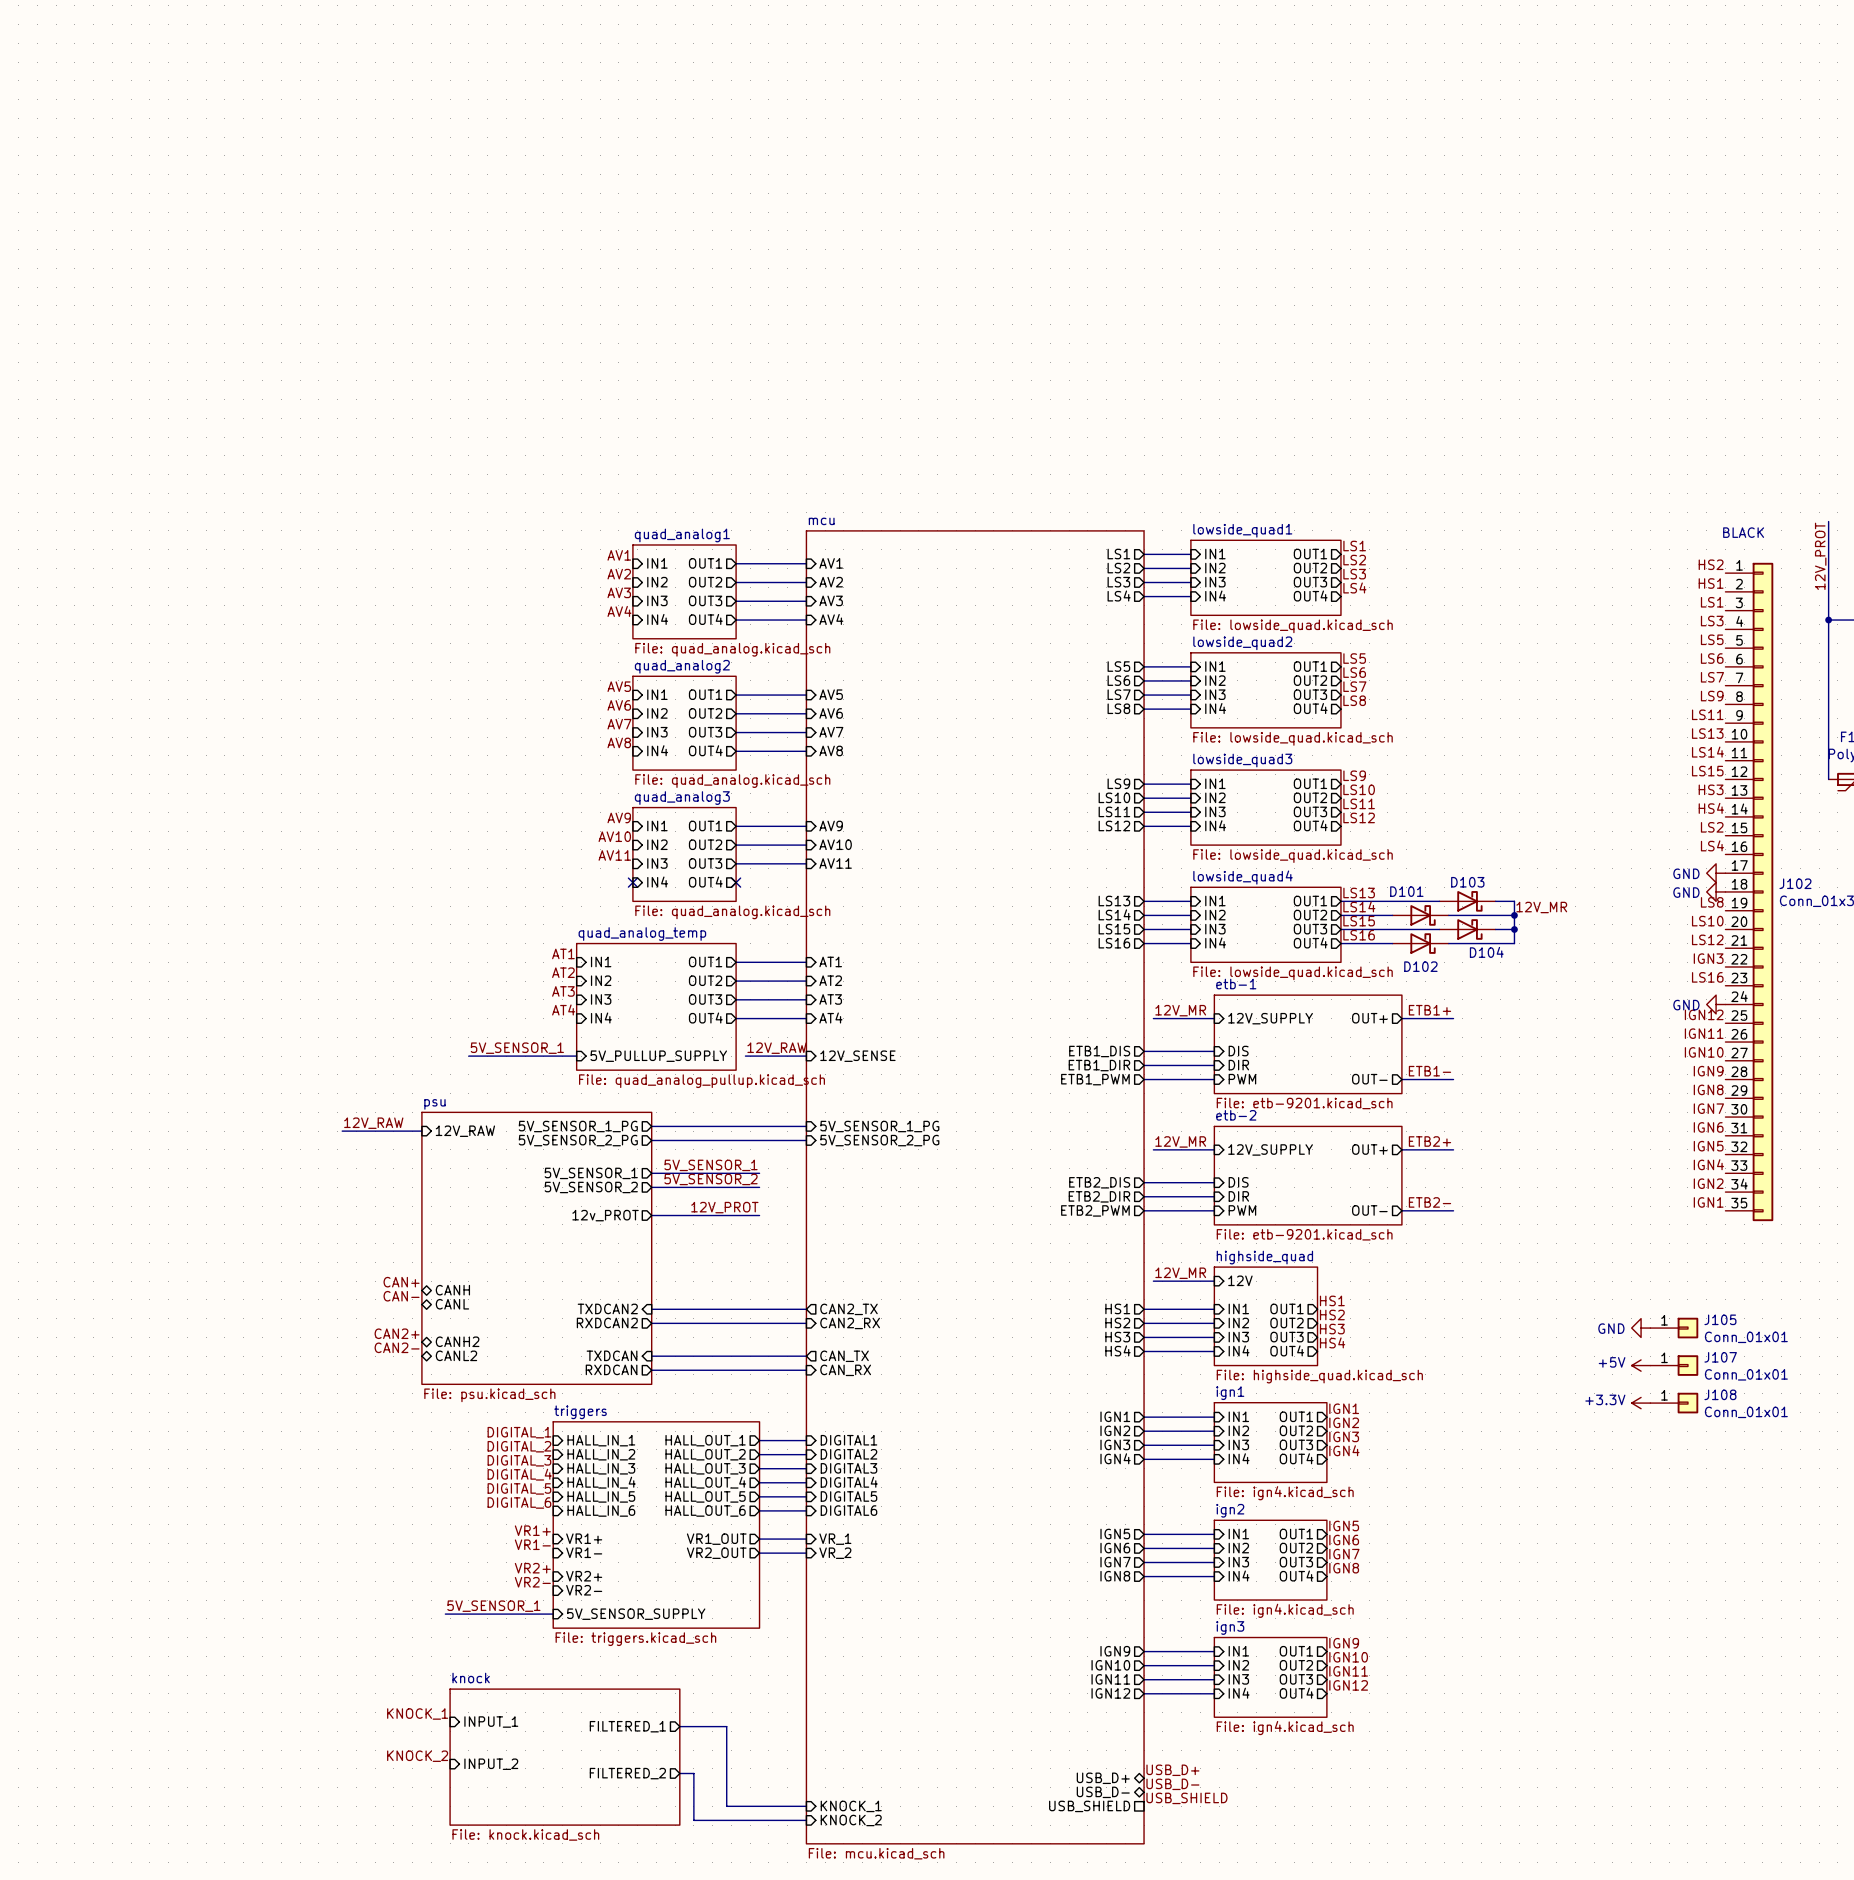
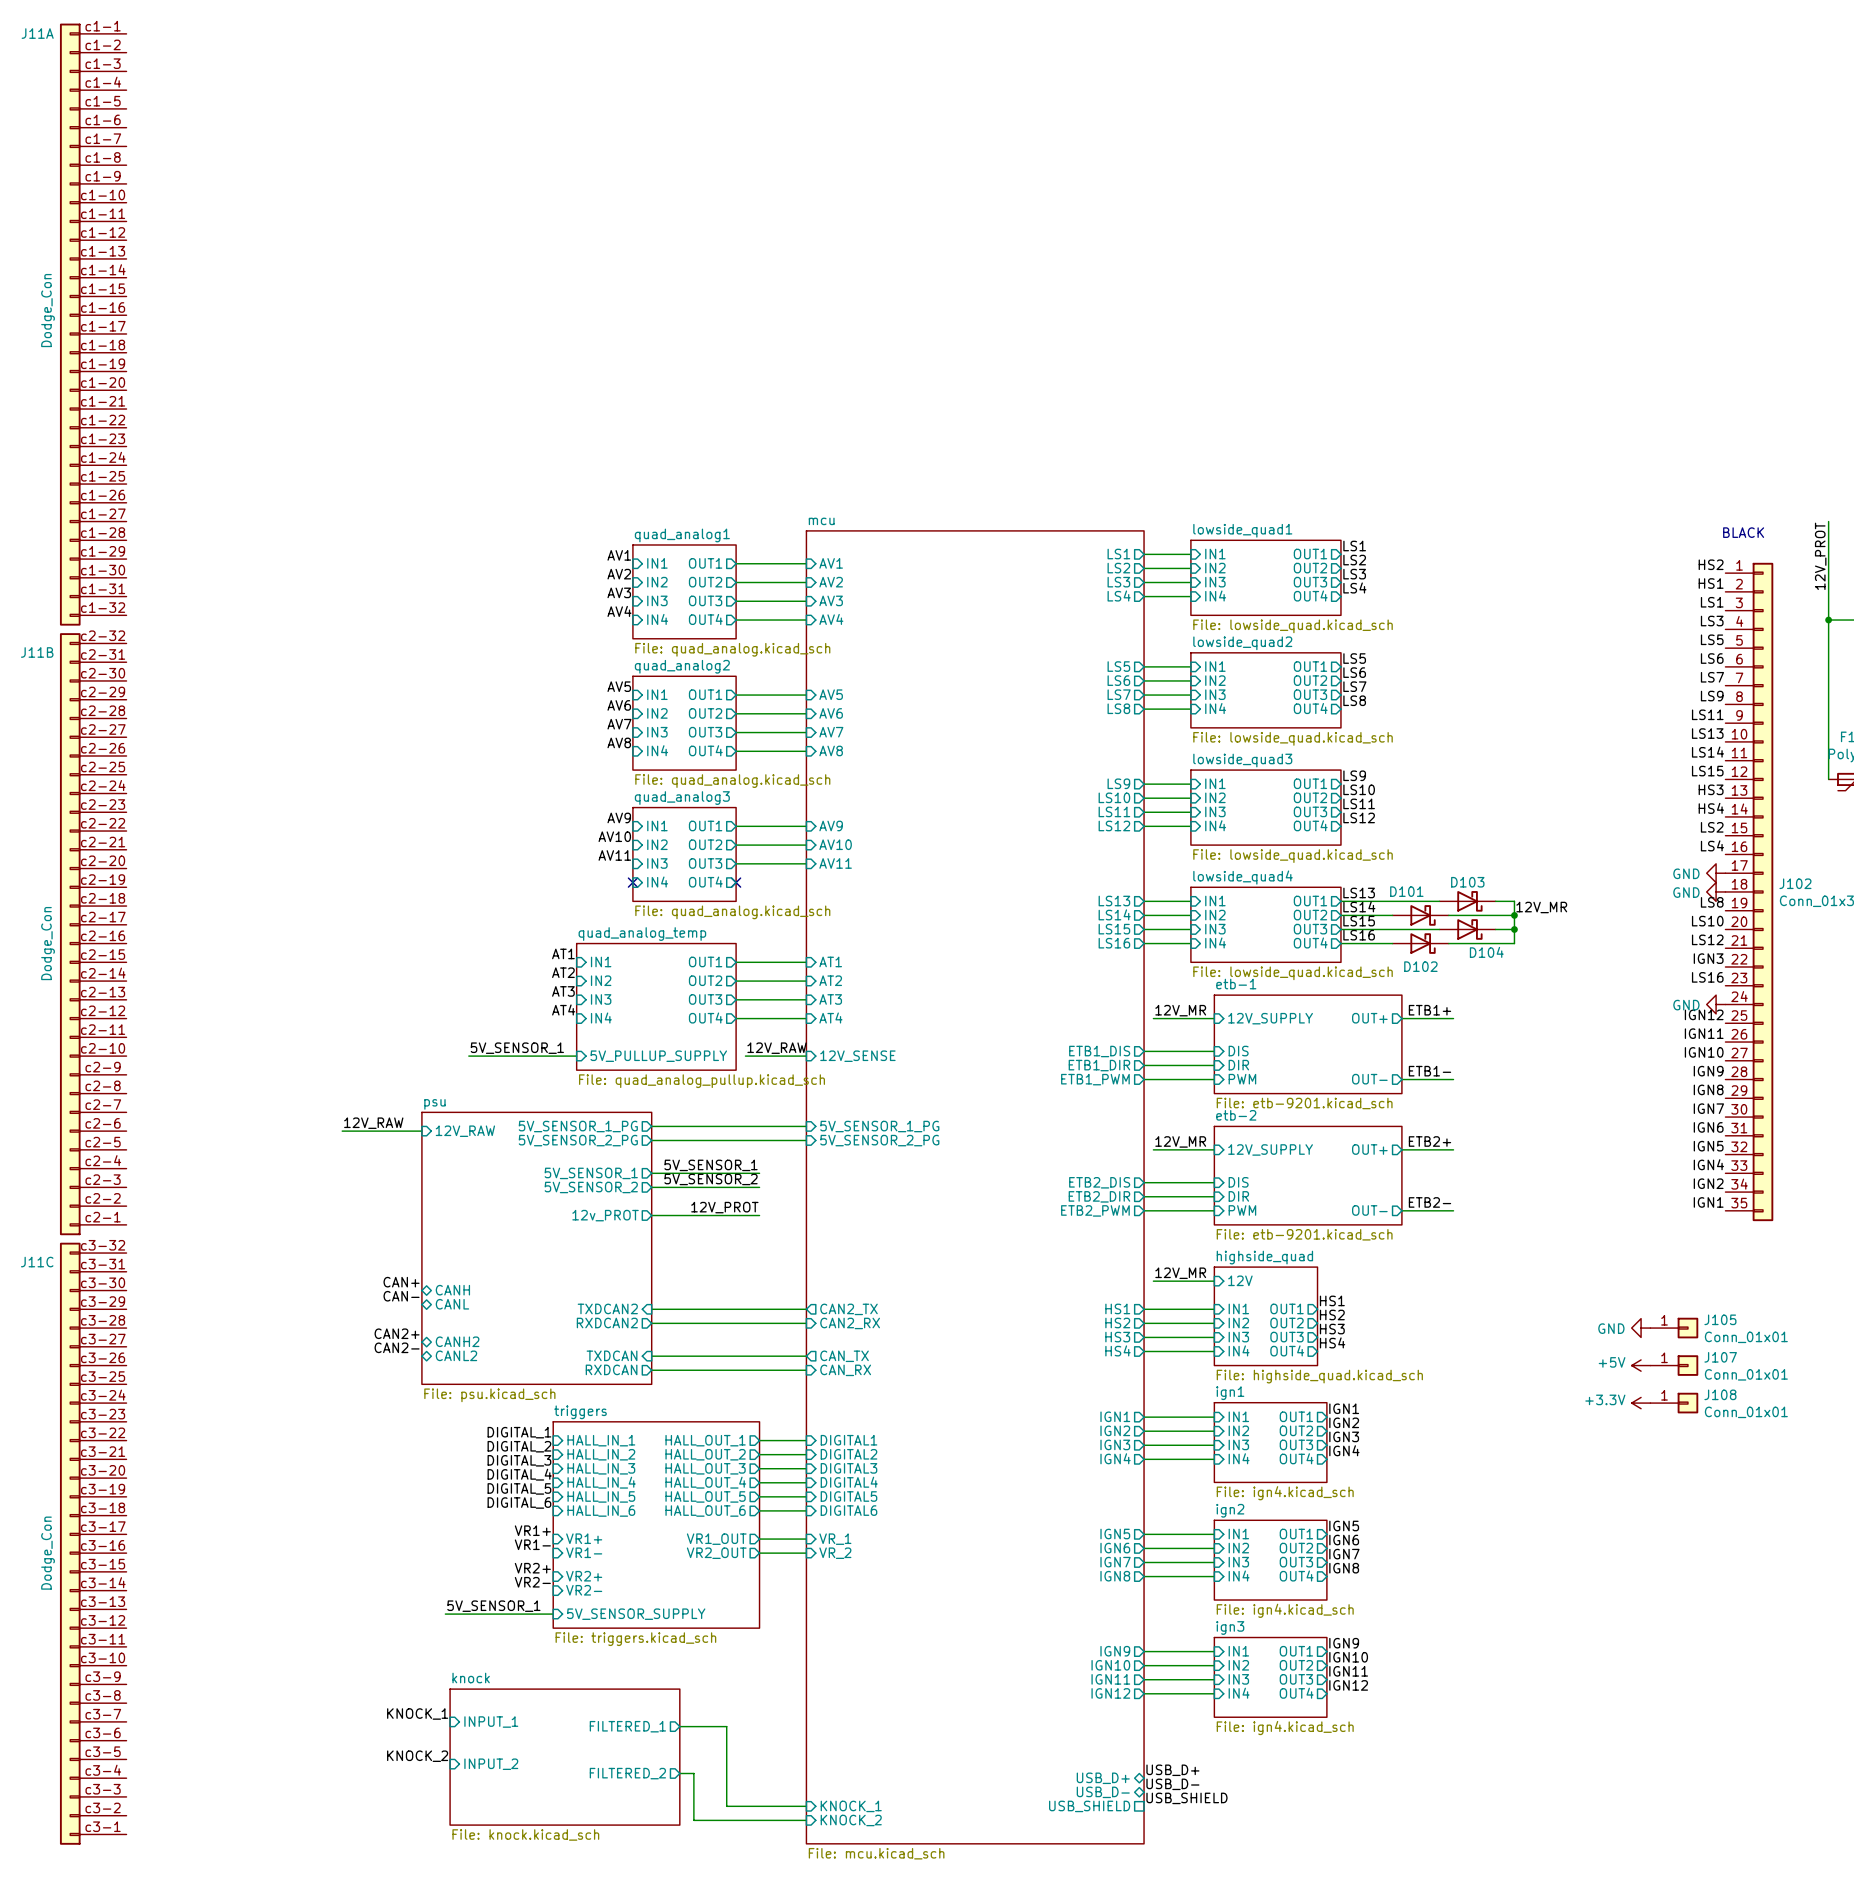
J11A: none -> Dodge_Con (93, 324)
J11B: none -> Dodge_Con (93, 934)
J11C: none -> Dodge_Con (93, 1543)

